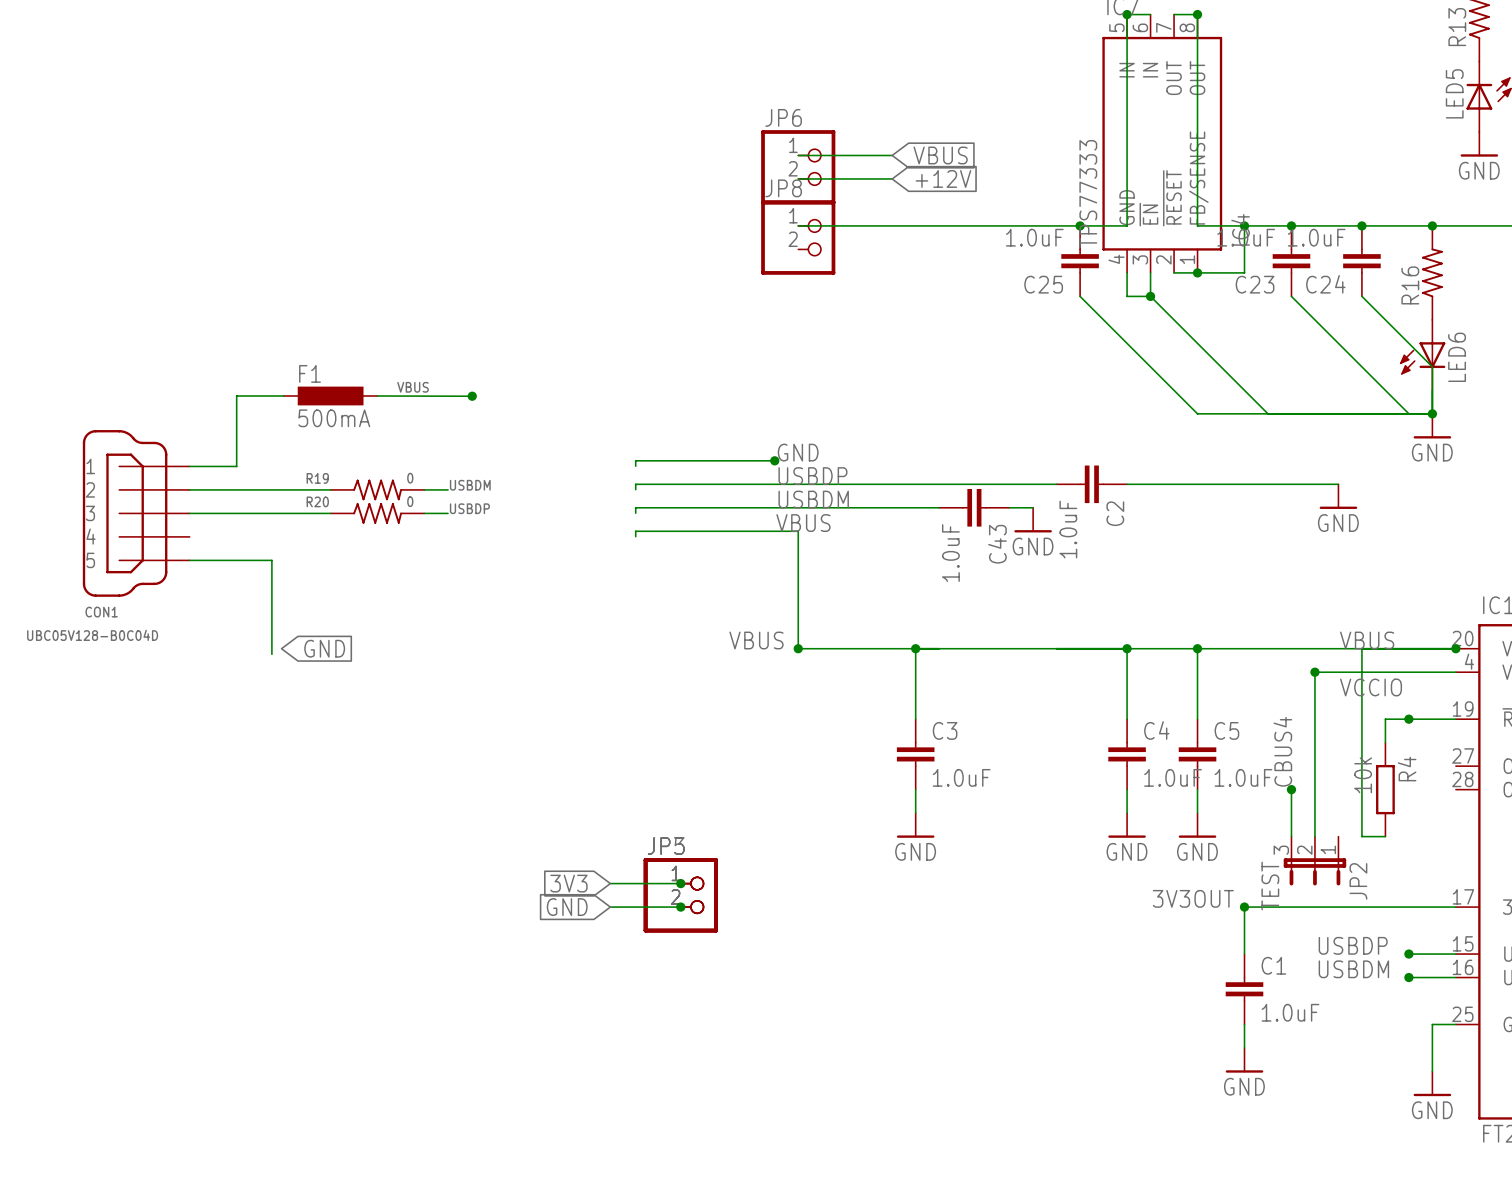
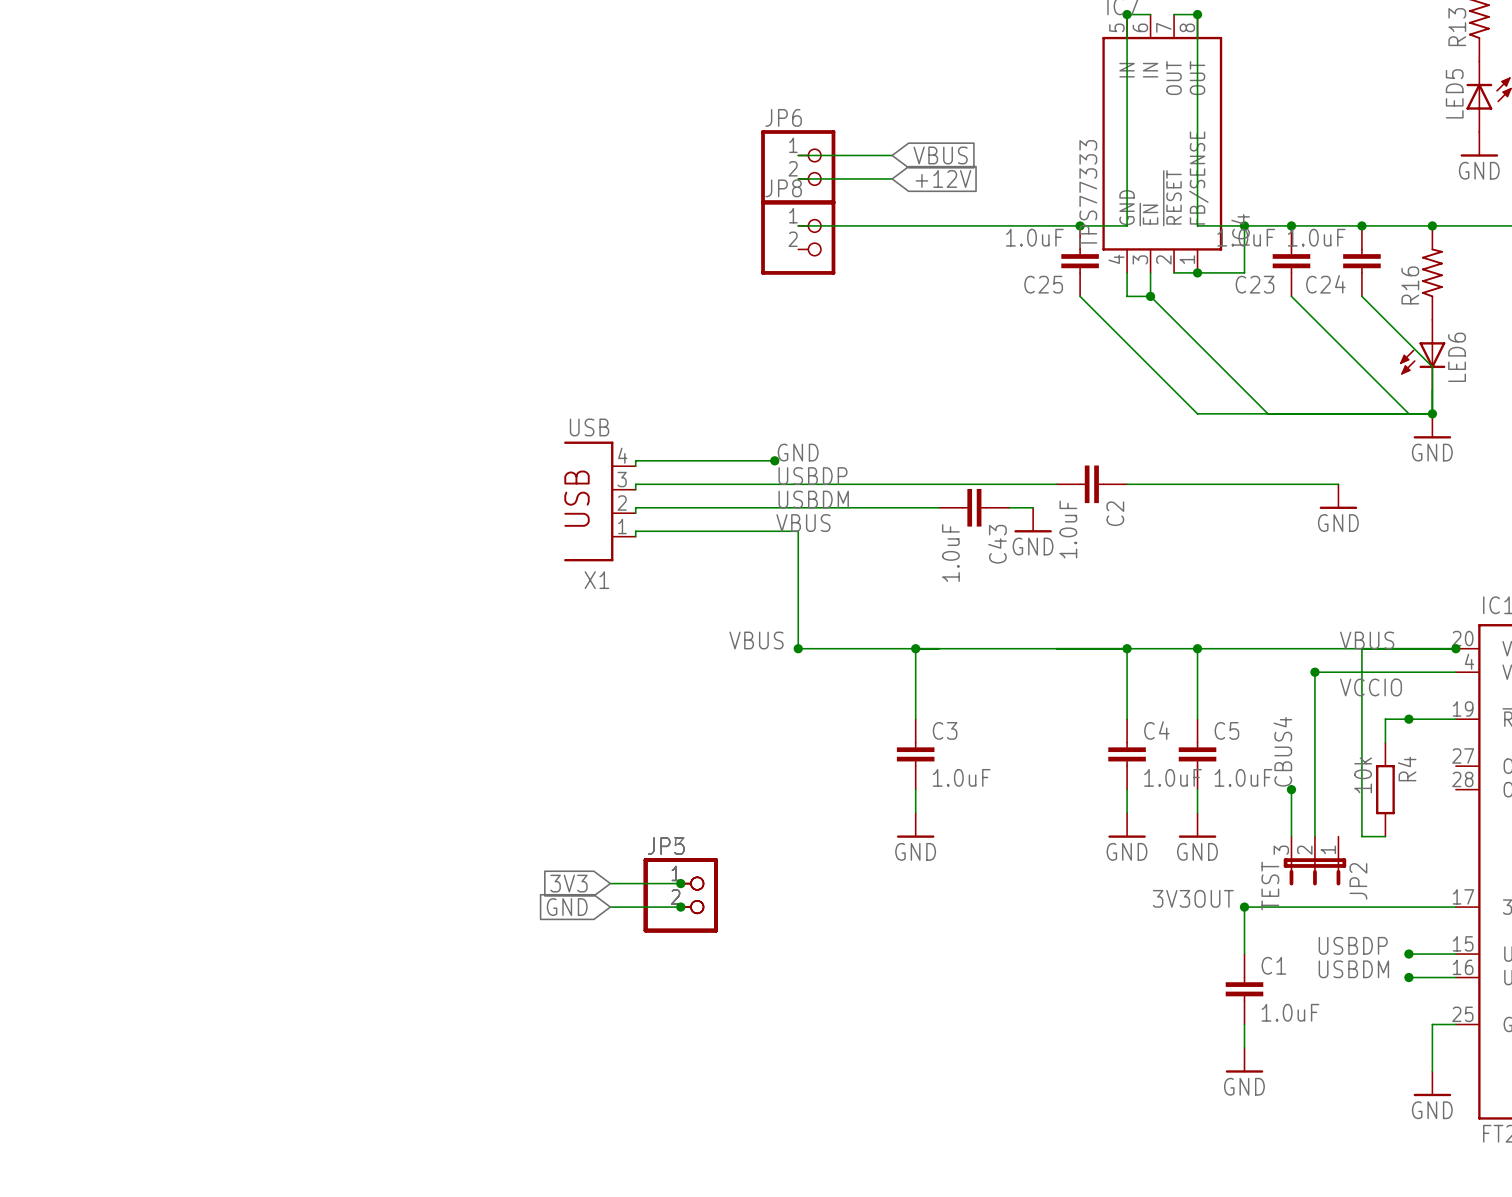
label: VBUS (413, 387) -> none
wire: (283, 395) (236, 395) (236, 466) (189, 466) -> none
F1: 500mA (330, 395) -> none
wire: (377, 395) (472, 396) -> none
junction: (472, 396) -> none
label: USBDM (470, 485) -> none
wire: (189, 489) (330, 489) -> none
R19: 0 (377, 489) -> none
wire: (424, 489) (448, 489) -> none
X1: none -> USB (599, 501)
label: USBDP (469, 508) -> none
CON1: UBC05V128-B0C04D (136, 513) -> none
wire: (189, 513) (330, 513) -> none
R20: 0 (377, 513) -> none
wire: (424, 513) (448, 513) -> none
wire: (189, 560) (271, 560) (271, 654) -> none
global label: GND (324, 648) -> none

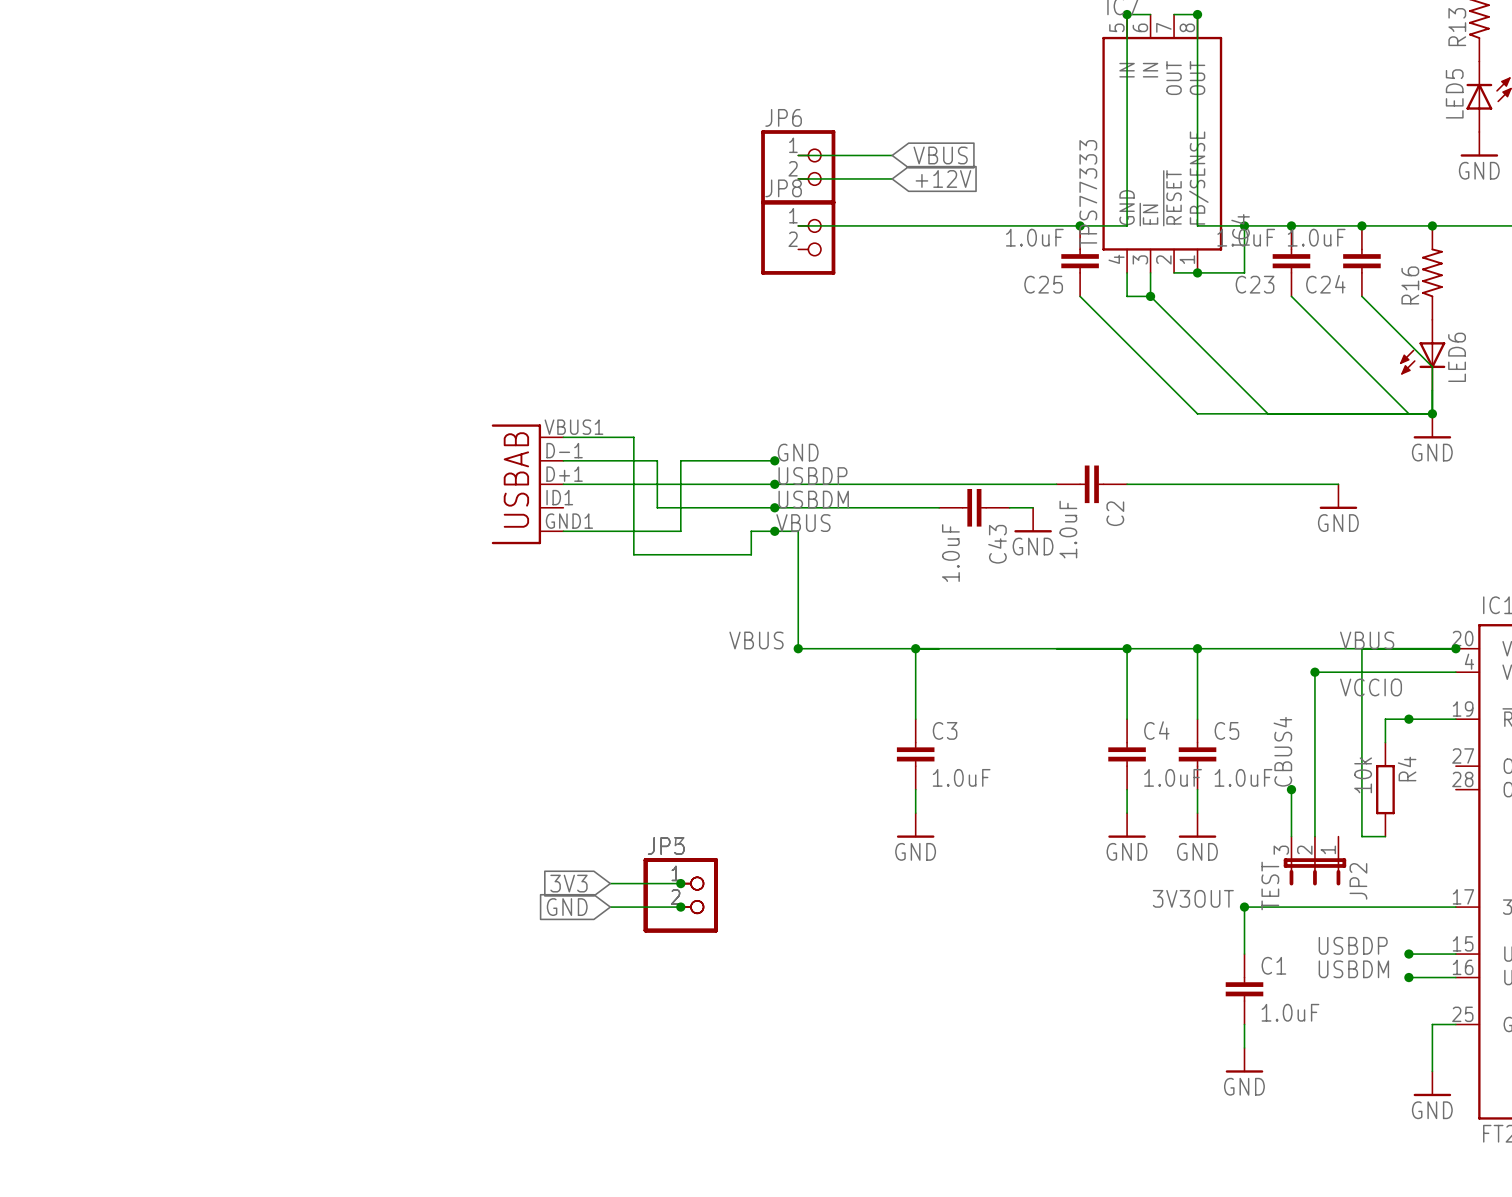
wire: none -> (563, 437) (633, 437) (633, 554) (751, 554) (751, 531)
wire: (635, 460) (635, 466) -> (635, 460) (563, 460)
wire: (657, 460) (680, 460) -> (657, 460) (657, 507)
part: none -> (527, 484)
wire: (635, 484) (635, 489) -> (635, 484) (563, 484)
junction: none -> (774, 484)
X1: USB (599, 501) -> none
wire: (657, 507) (635, 507) (635, 513) -> none
junction: none -> (774, 507)
wire: (635, 531) (635, 536) -> (635, 531) (563, 531)
wire: (680, 531) (751, 531) -> (680, 531) (680, 460)
junction: none -> (774, 531)

